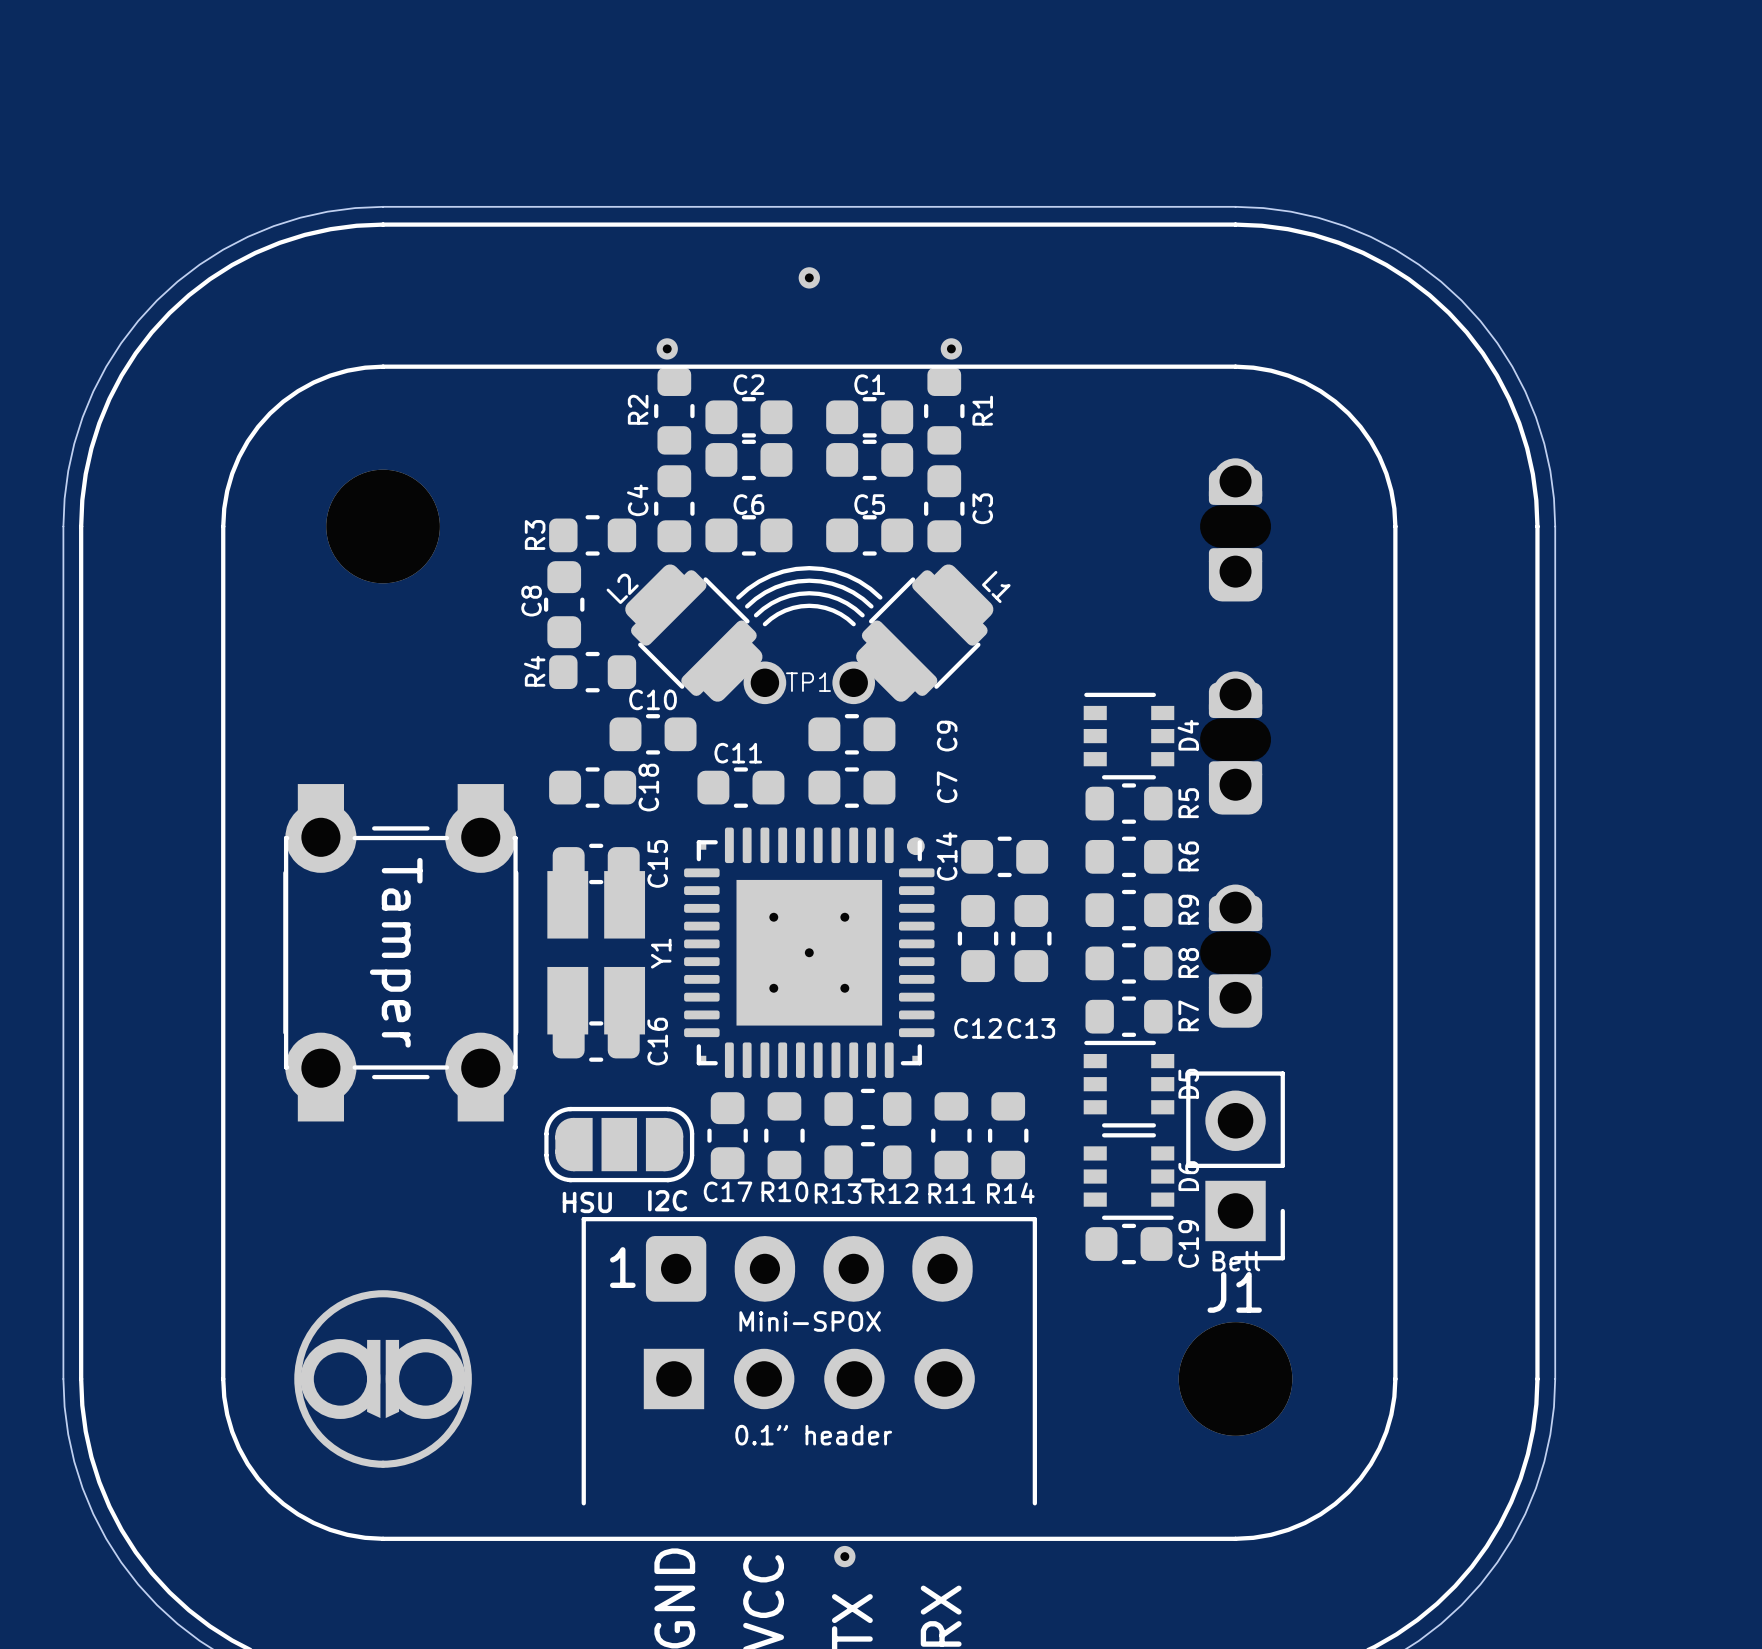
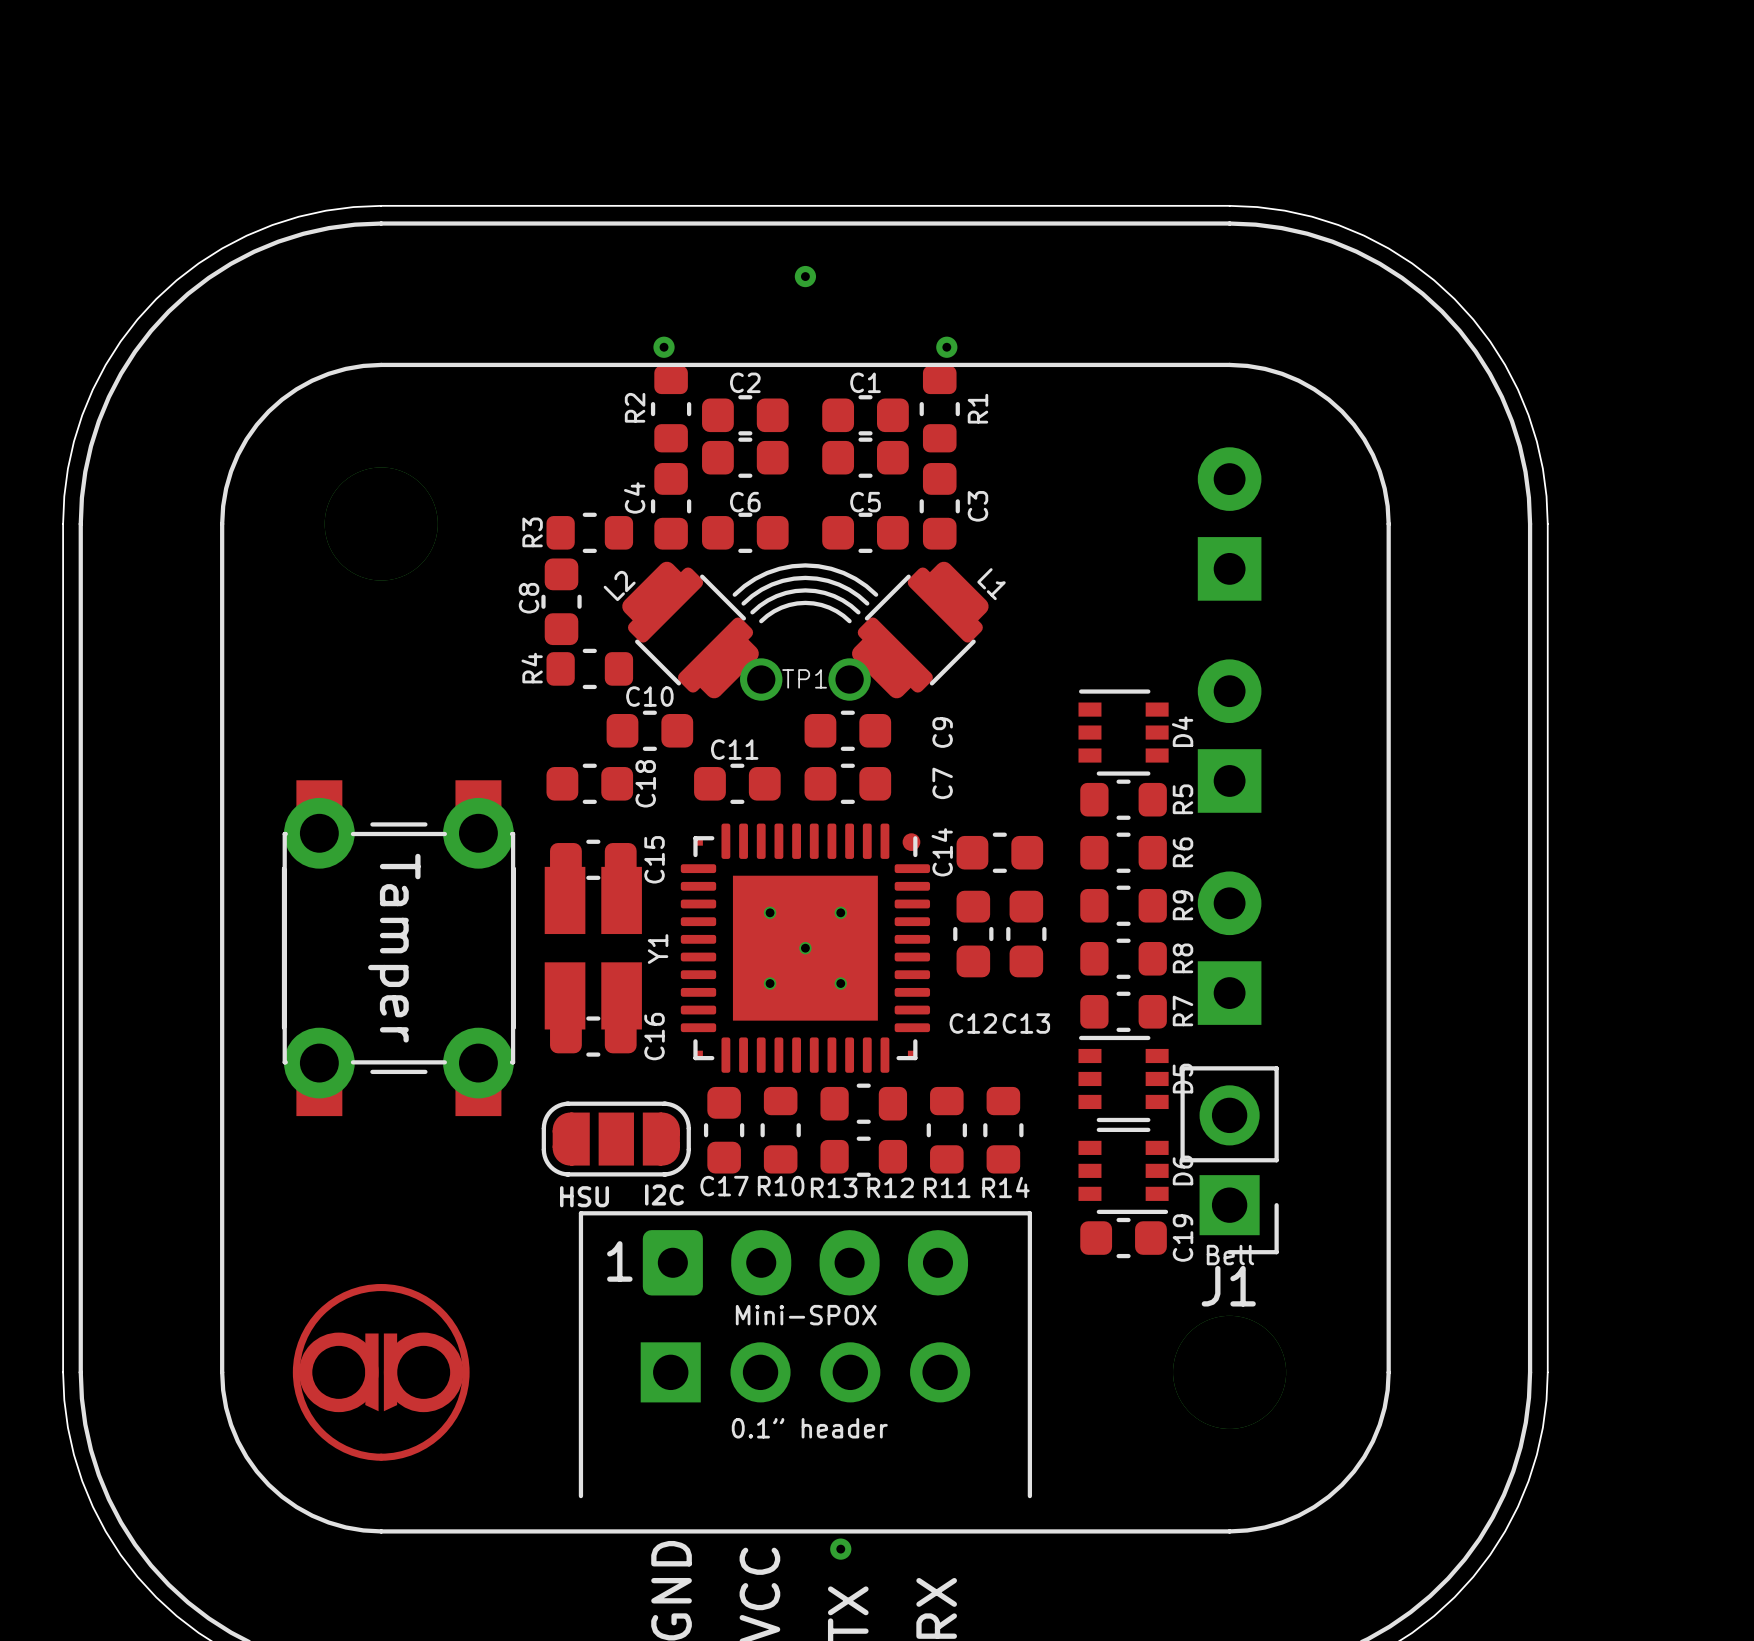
part footprint: [1200, 458, 1272, 602] -> [1197, 447, 1262, 601]
part footprint: [1200, 671, 1272, 815] -> [1197, 659, 1262, 813]
part footprint: [1200, 884, 1272, 1028] -> [1197, 871, 1262, 1025]

